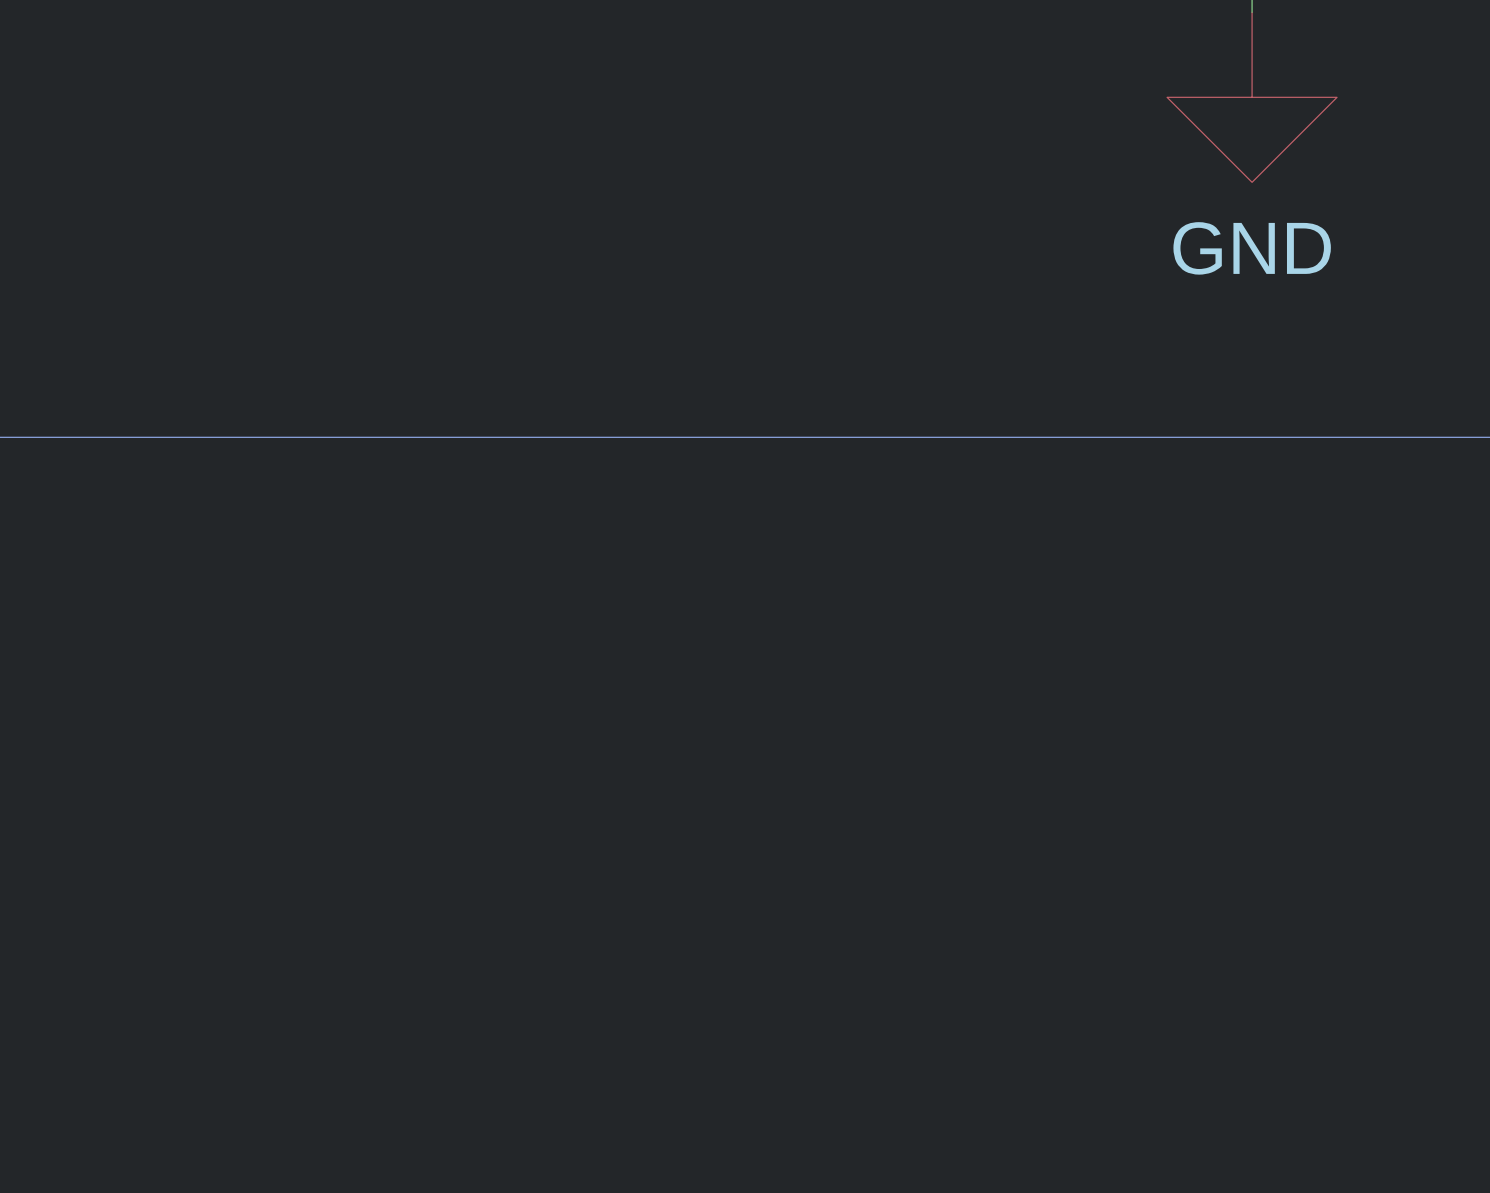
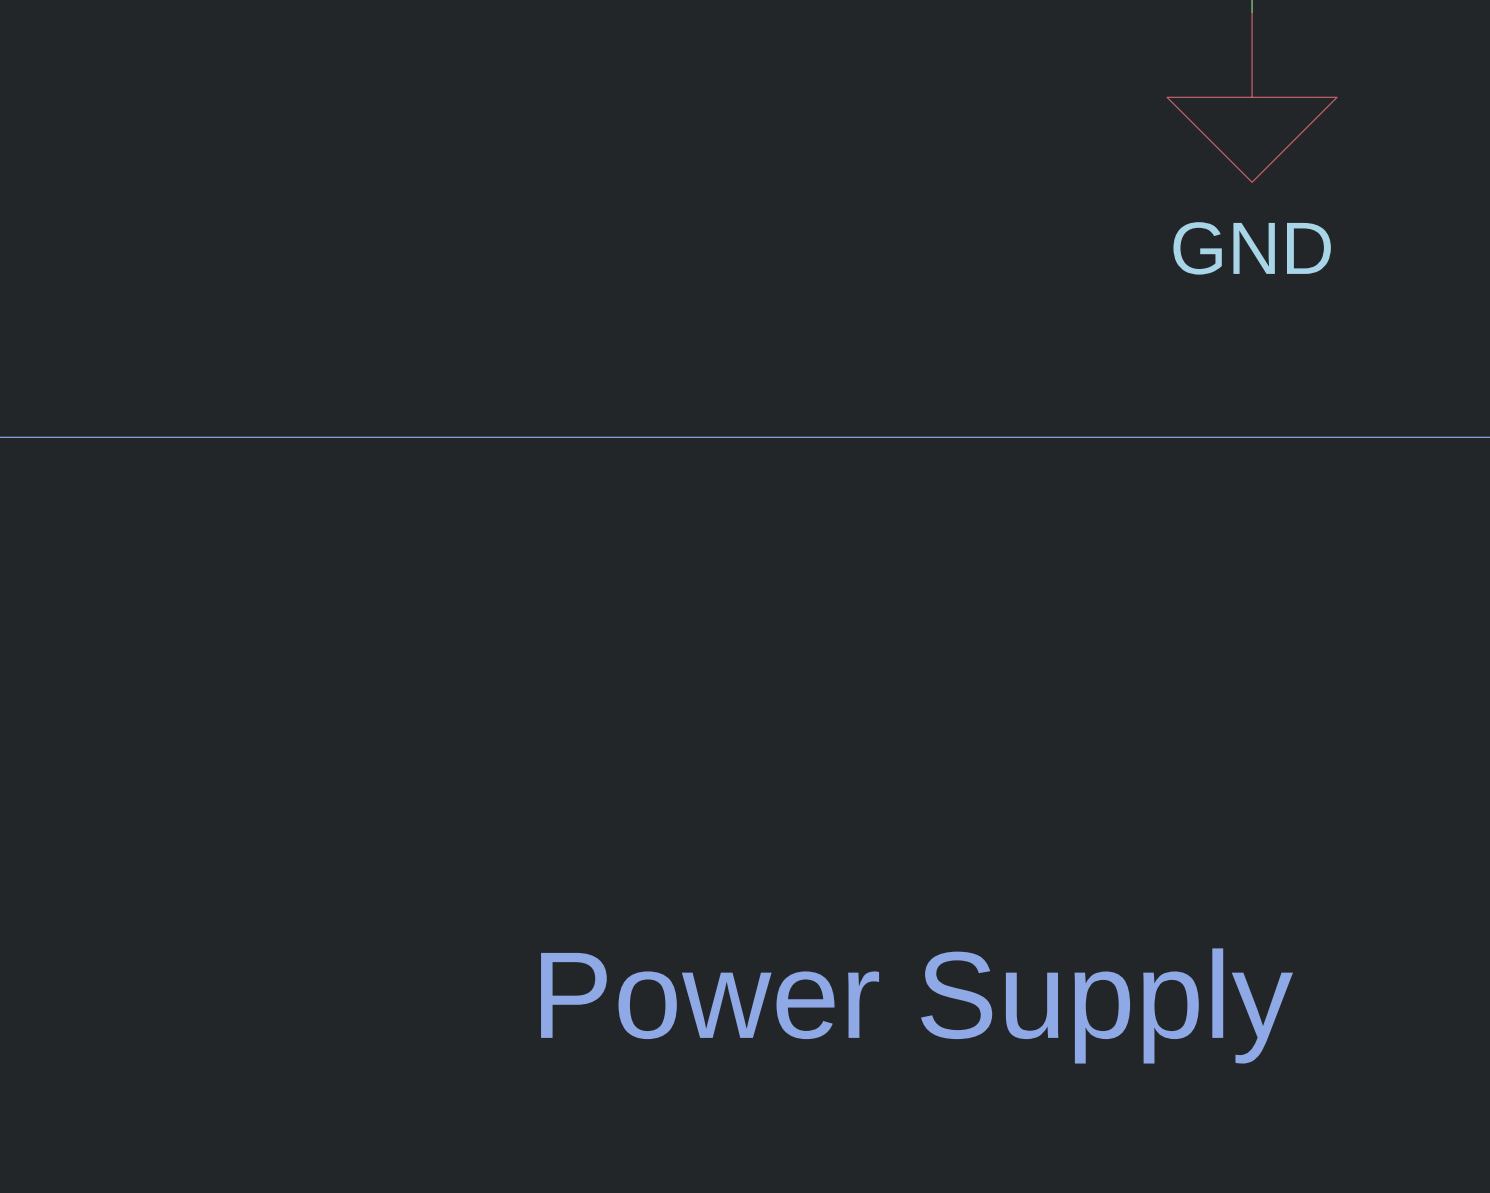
text: none -> Power Supply (917, 1005)

